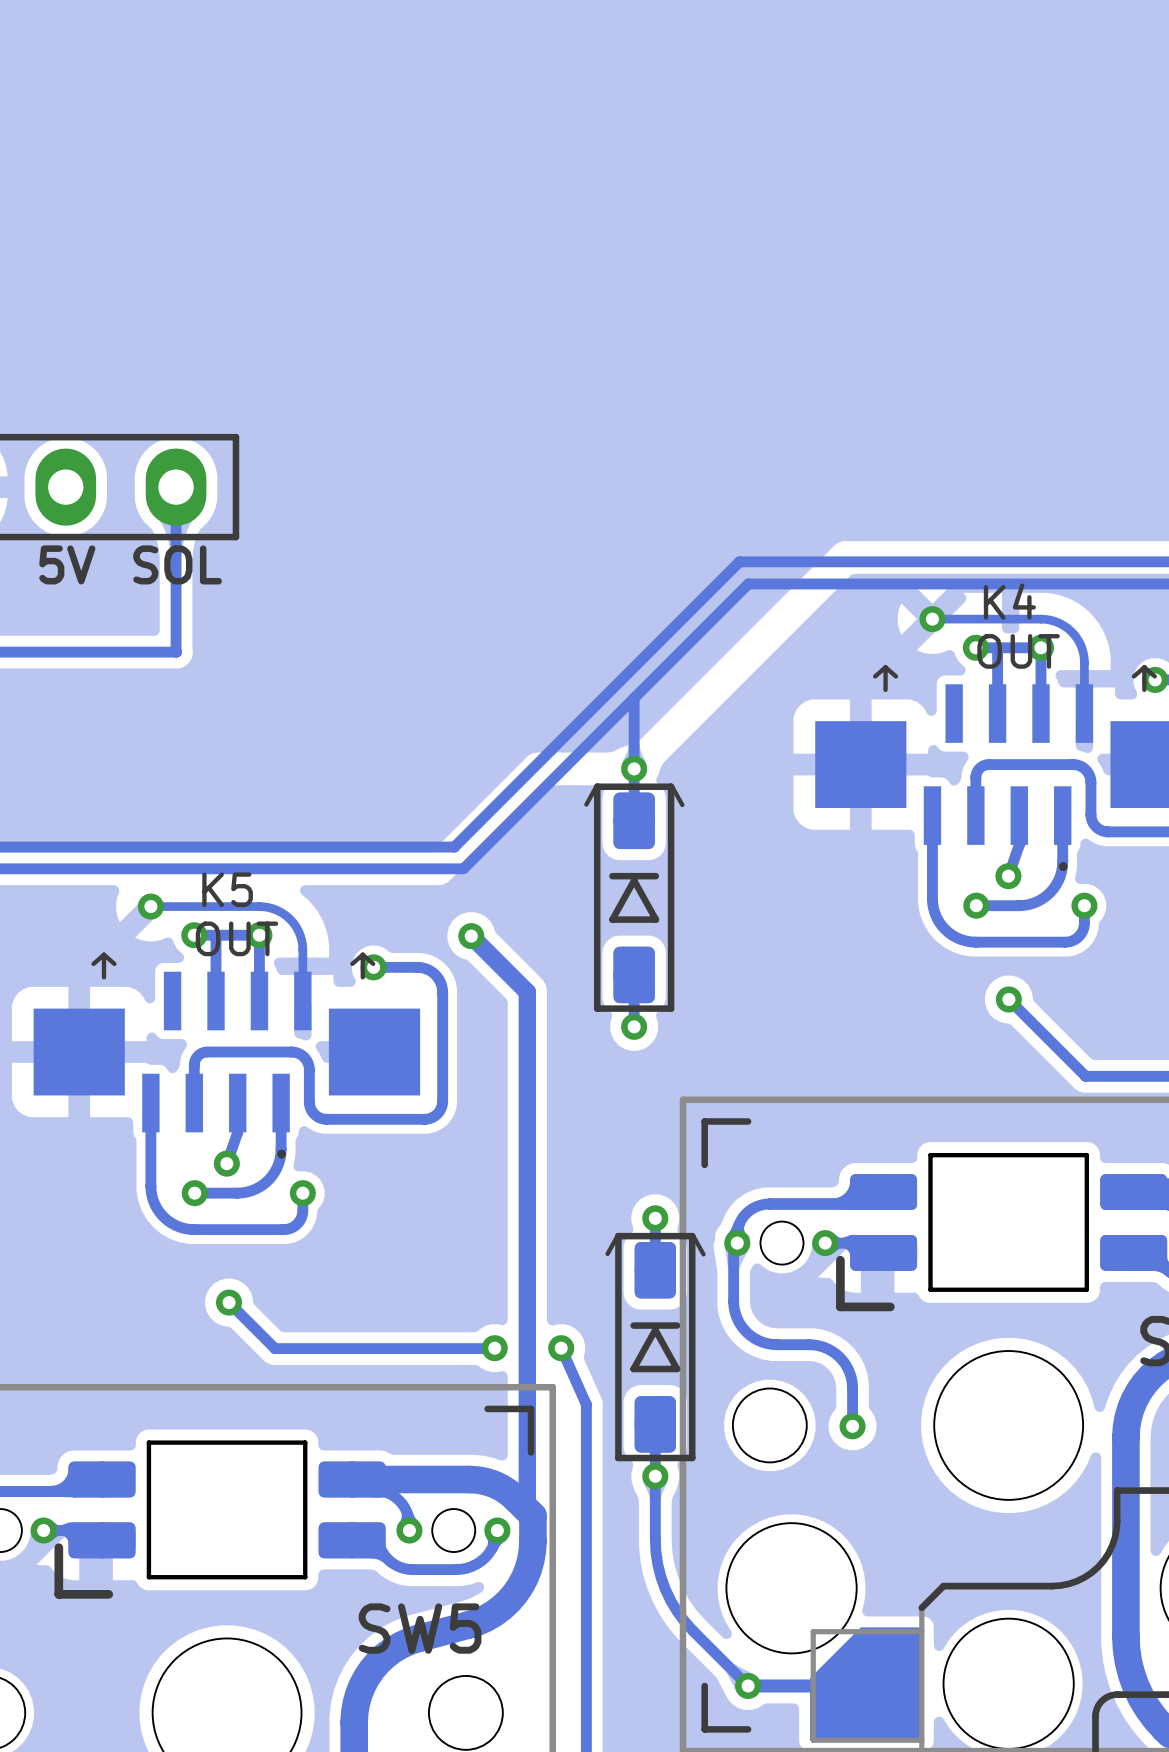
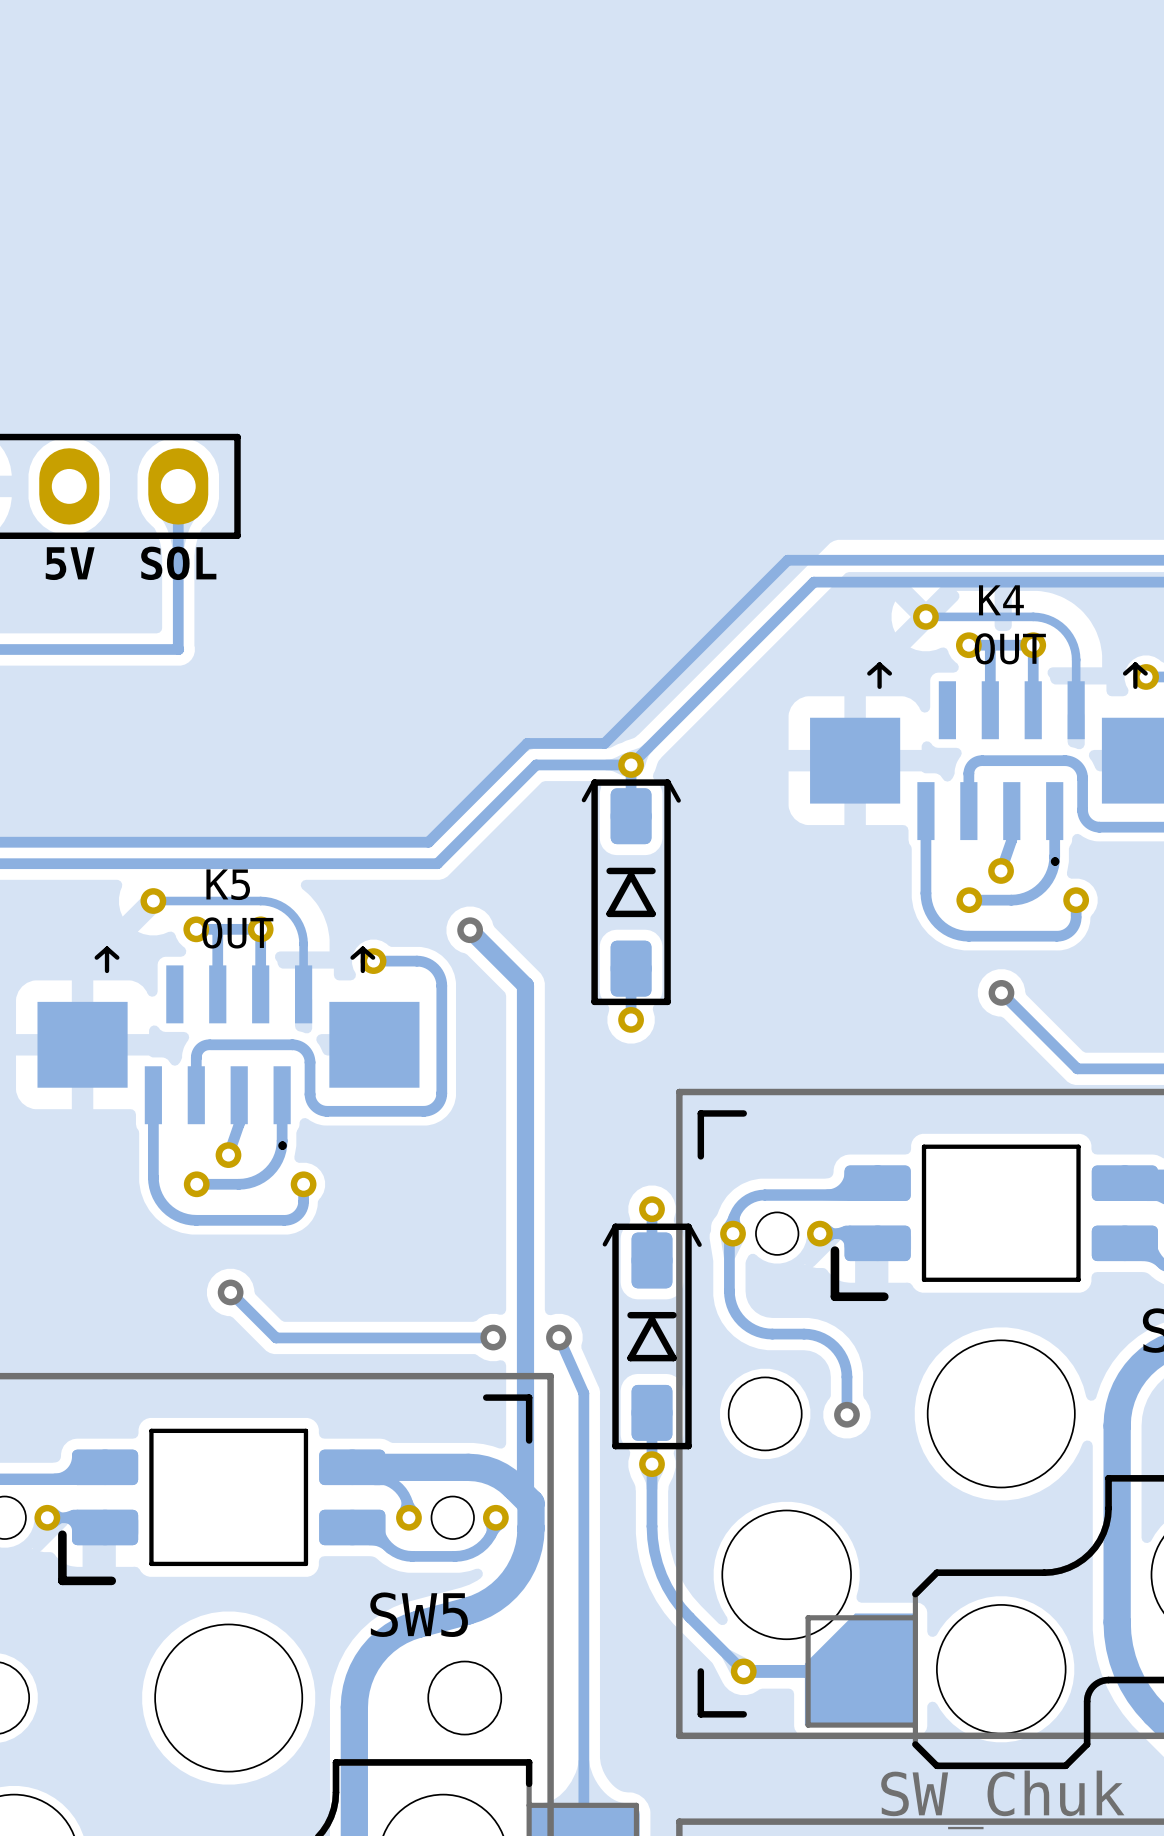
track: (792, 561) (739, 561) (454, 847) (429, 847) -> (787, 560) (604, 743) (527, 743) (428, 842)
track: (819, 583) (748, 583) (463, 868) (438, 868) -> (813, 582) (631, 764) (536, 764) (437, 863)
track: (634, 698) (634, 768) -> none

